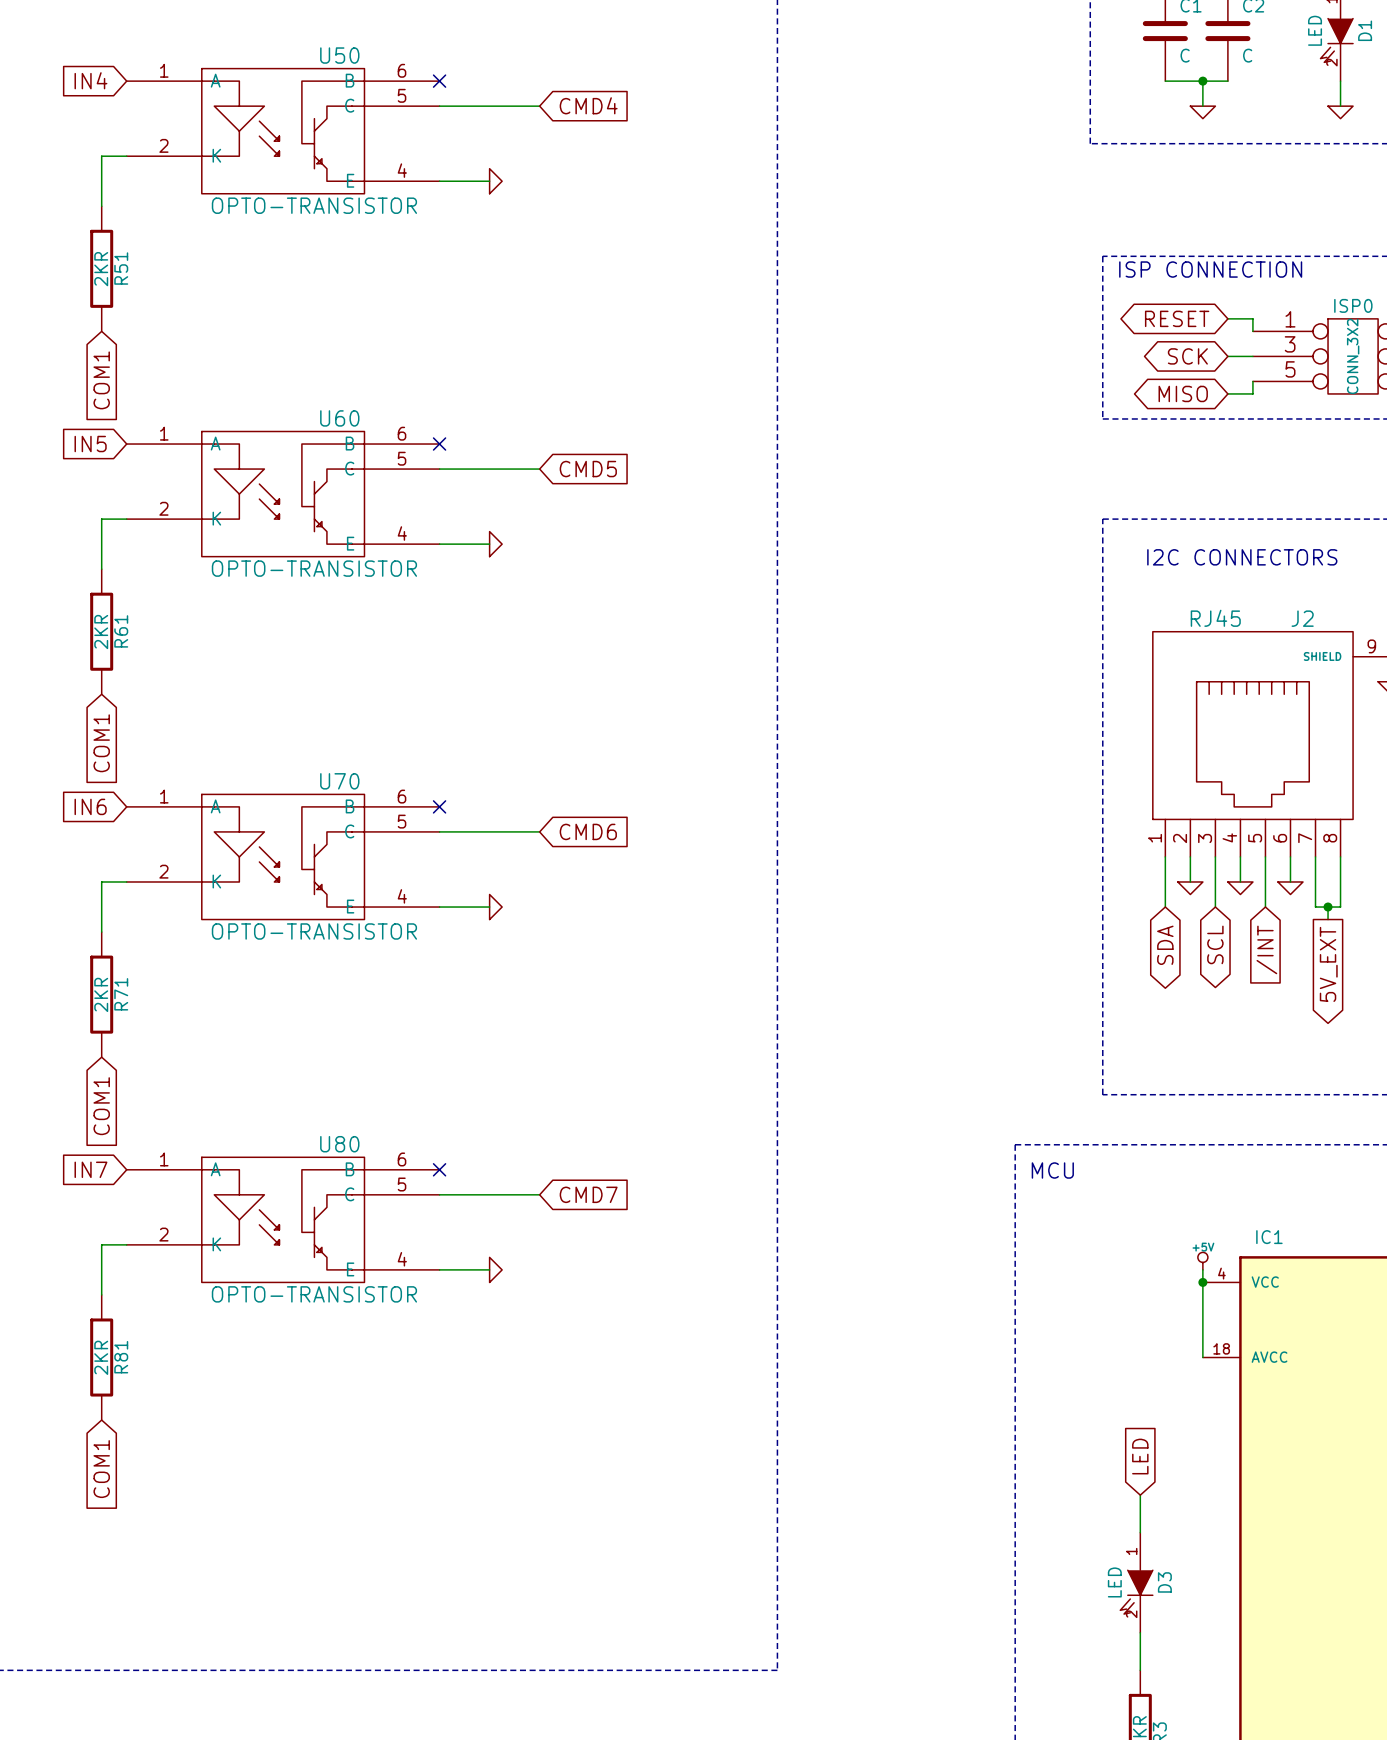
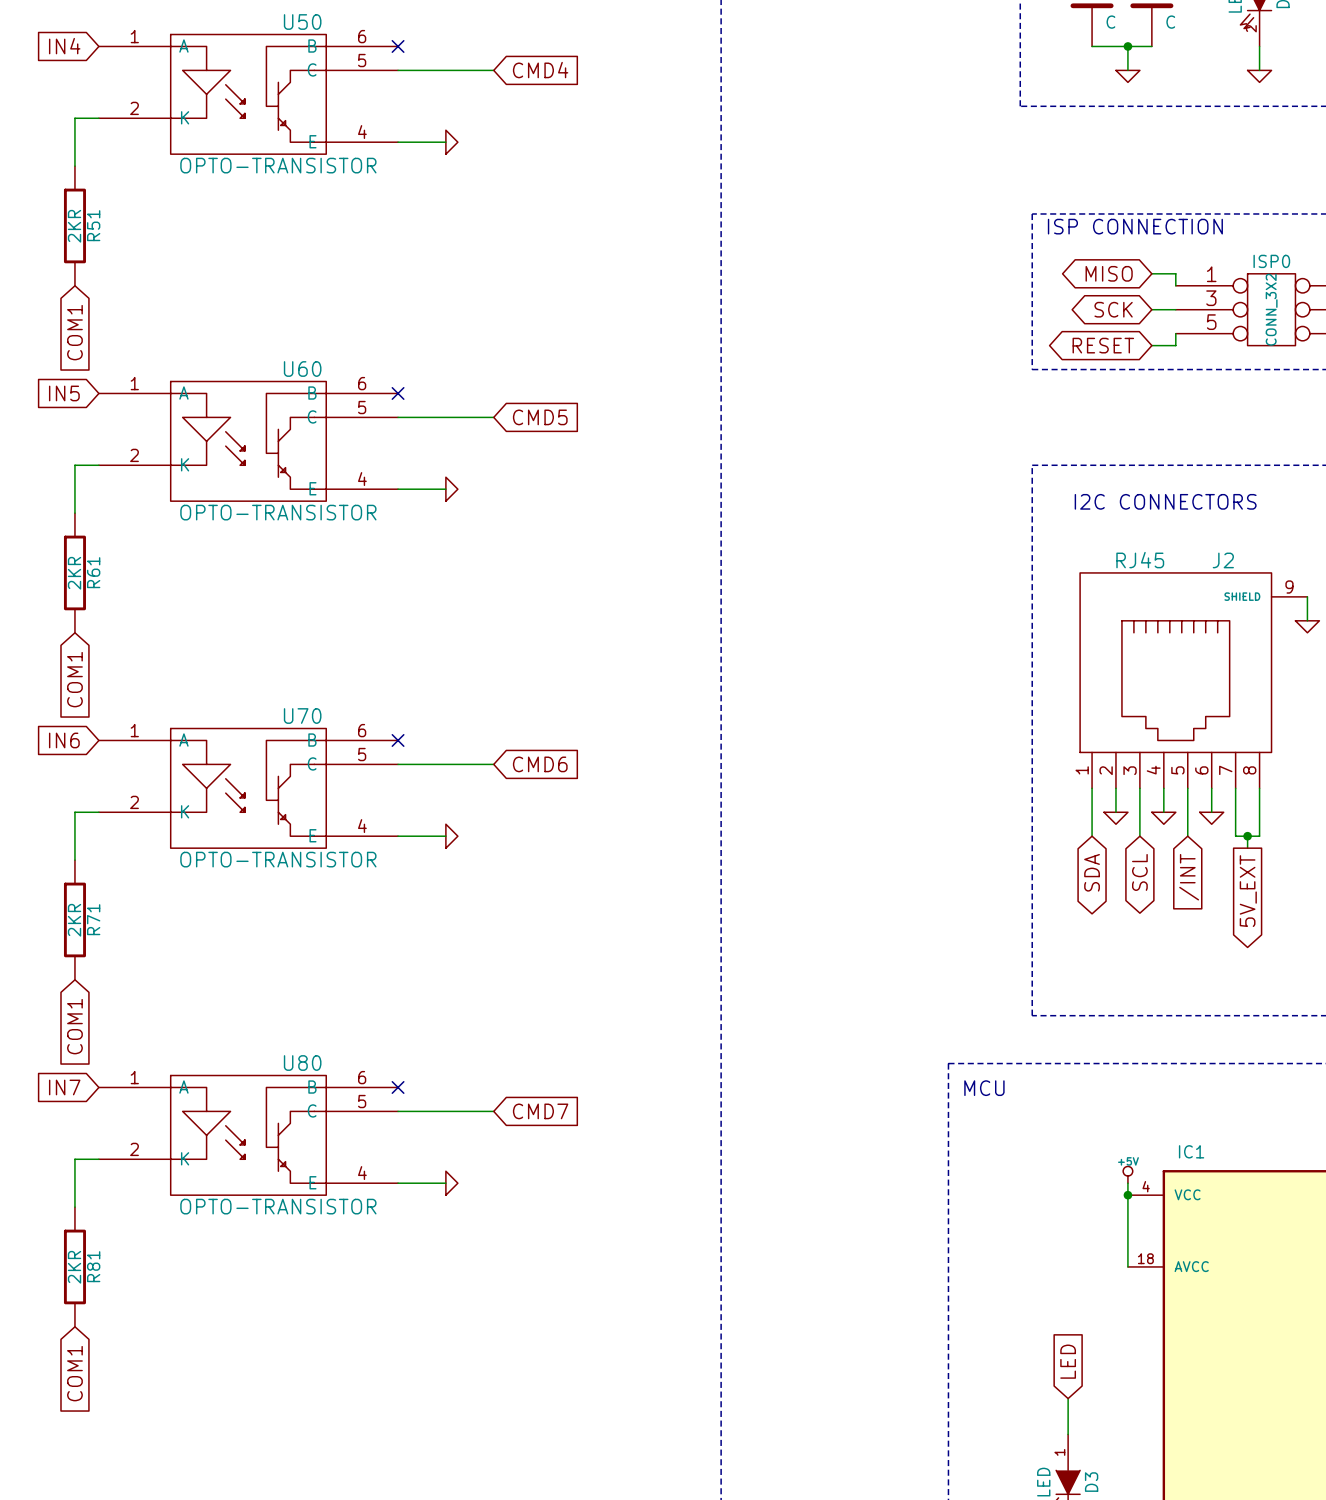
global label: RESET (1177, 318) -> MISO (1109, 273)
global label: MISO (1183, 393) -> RESET (1103, 345)

